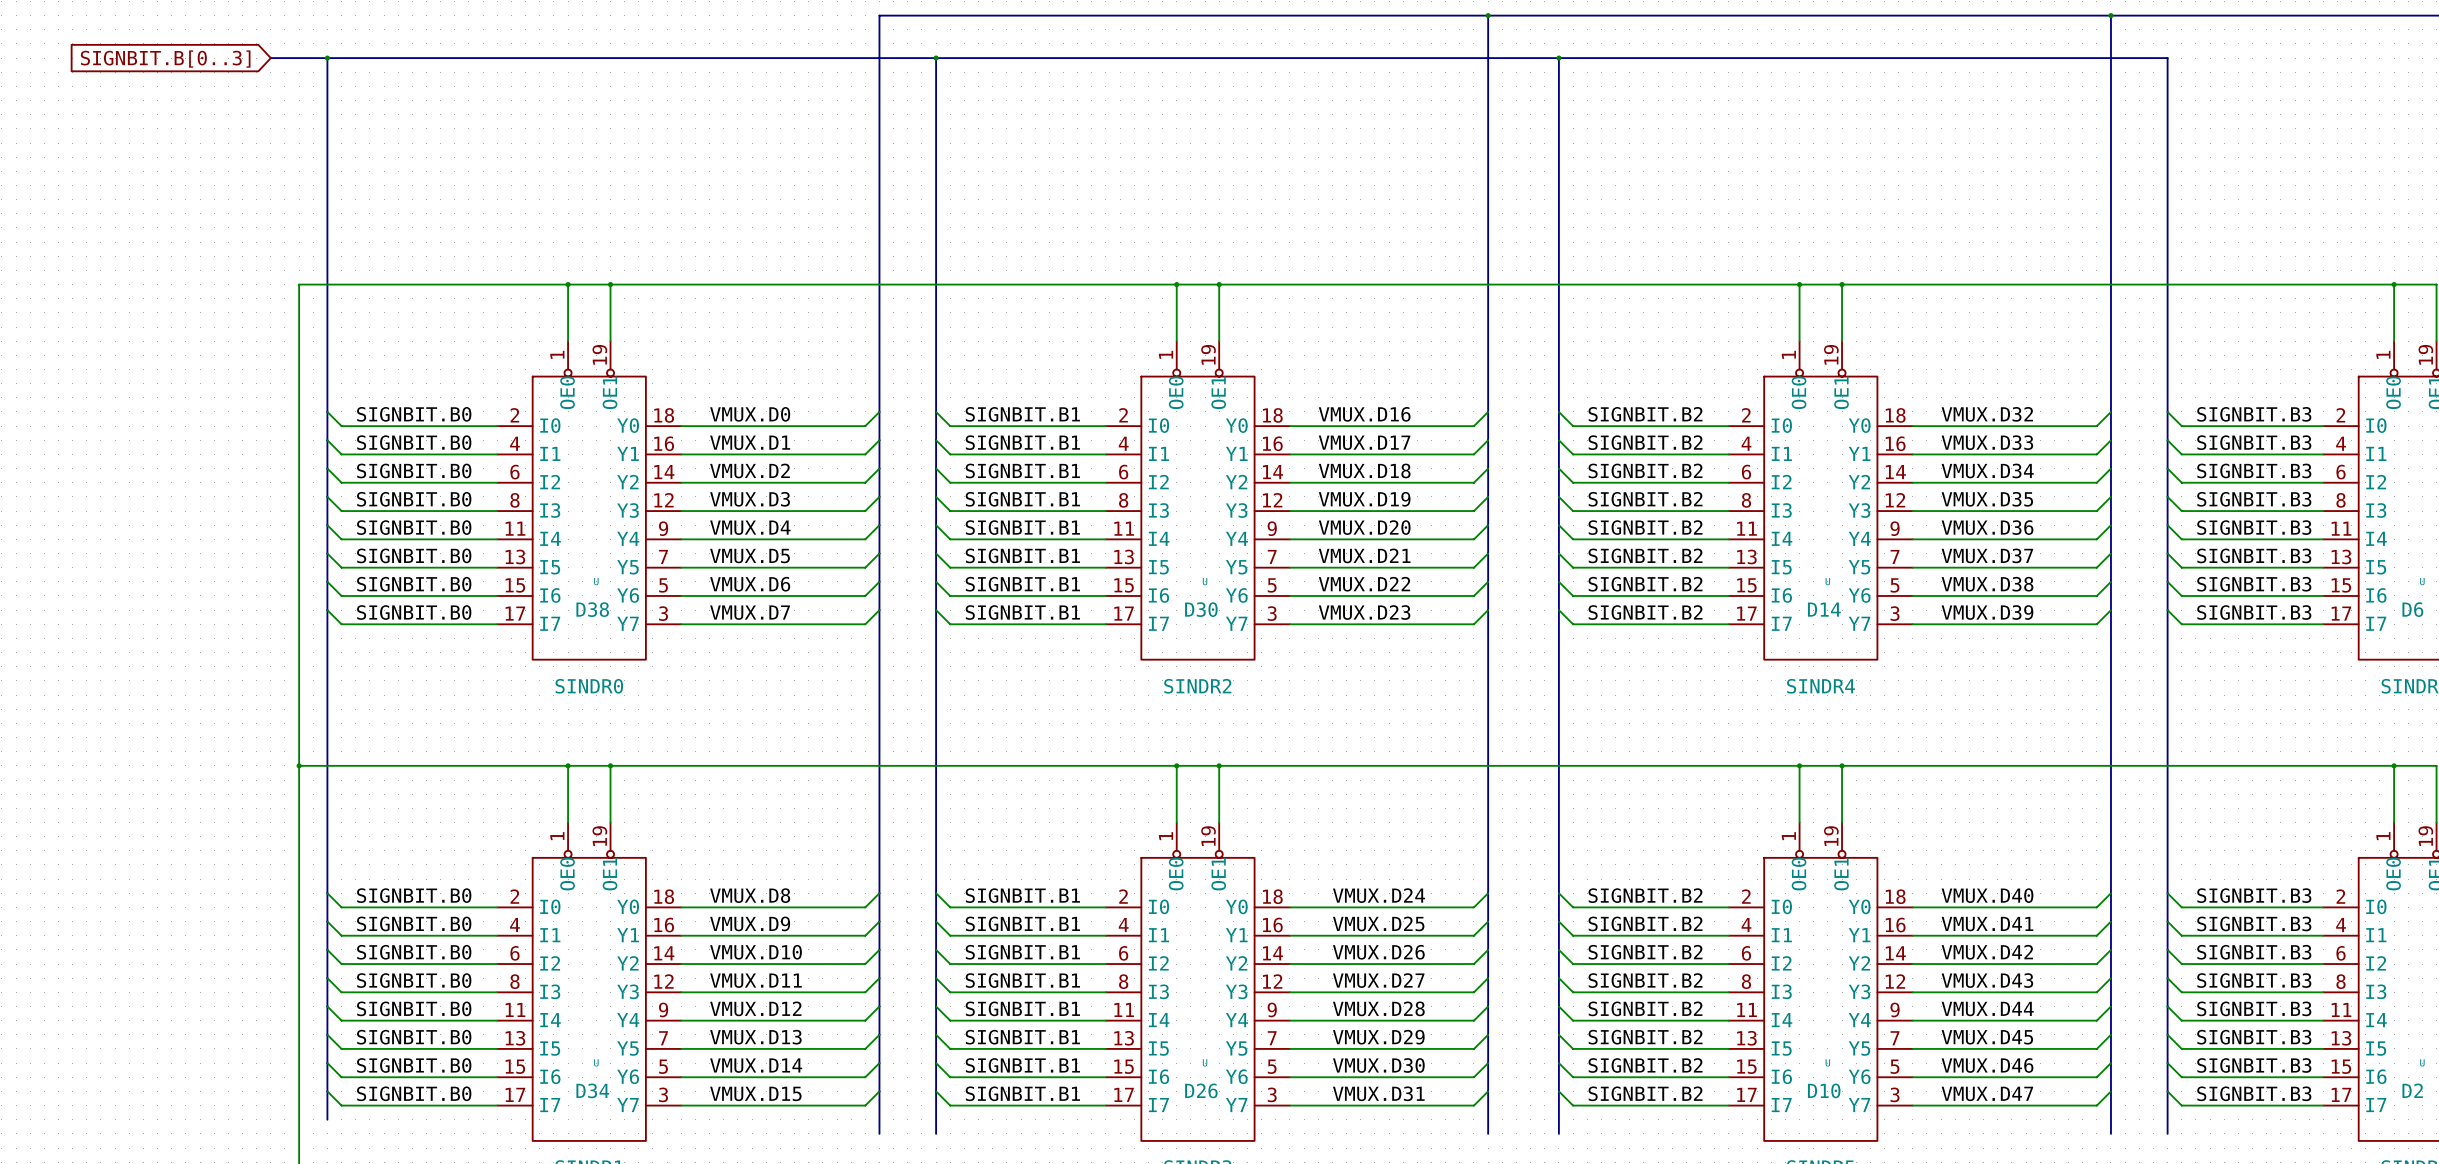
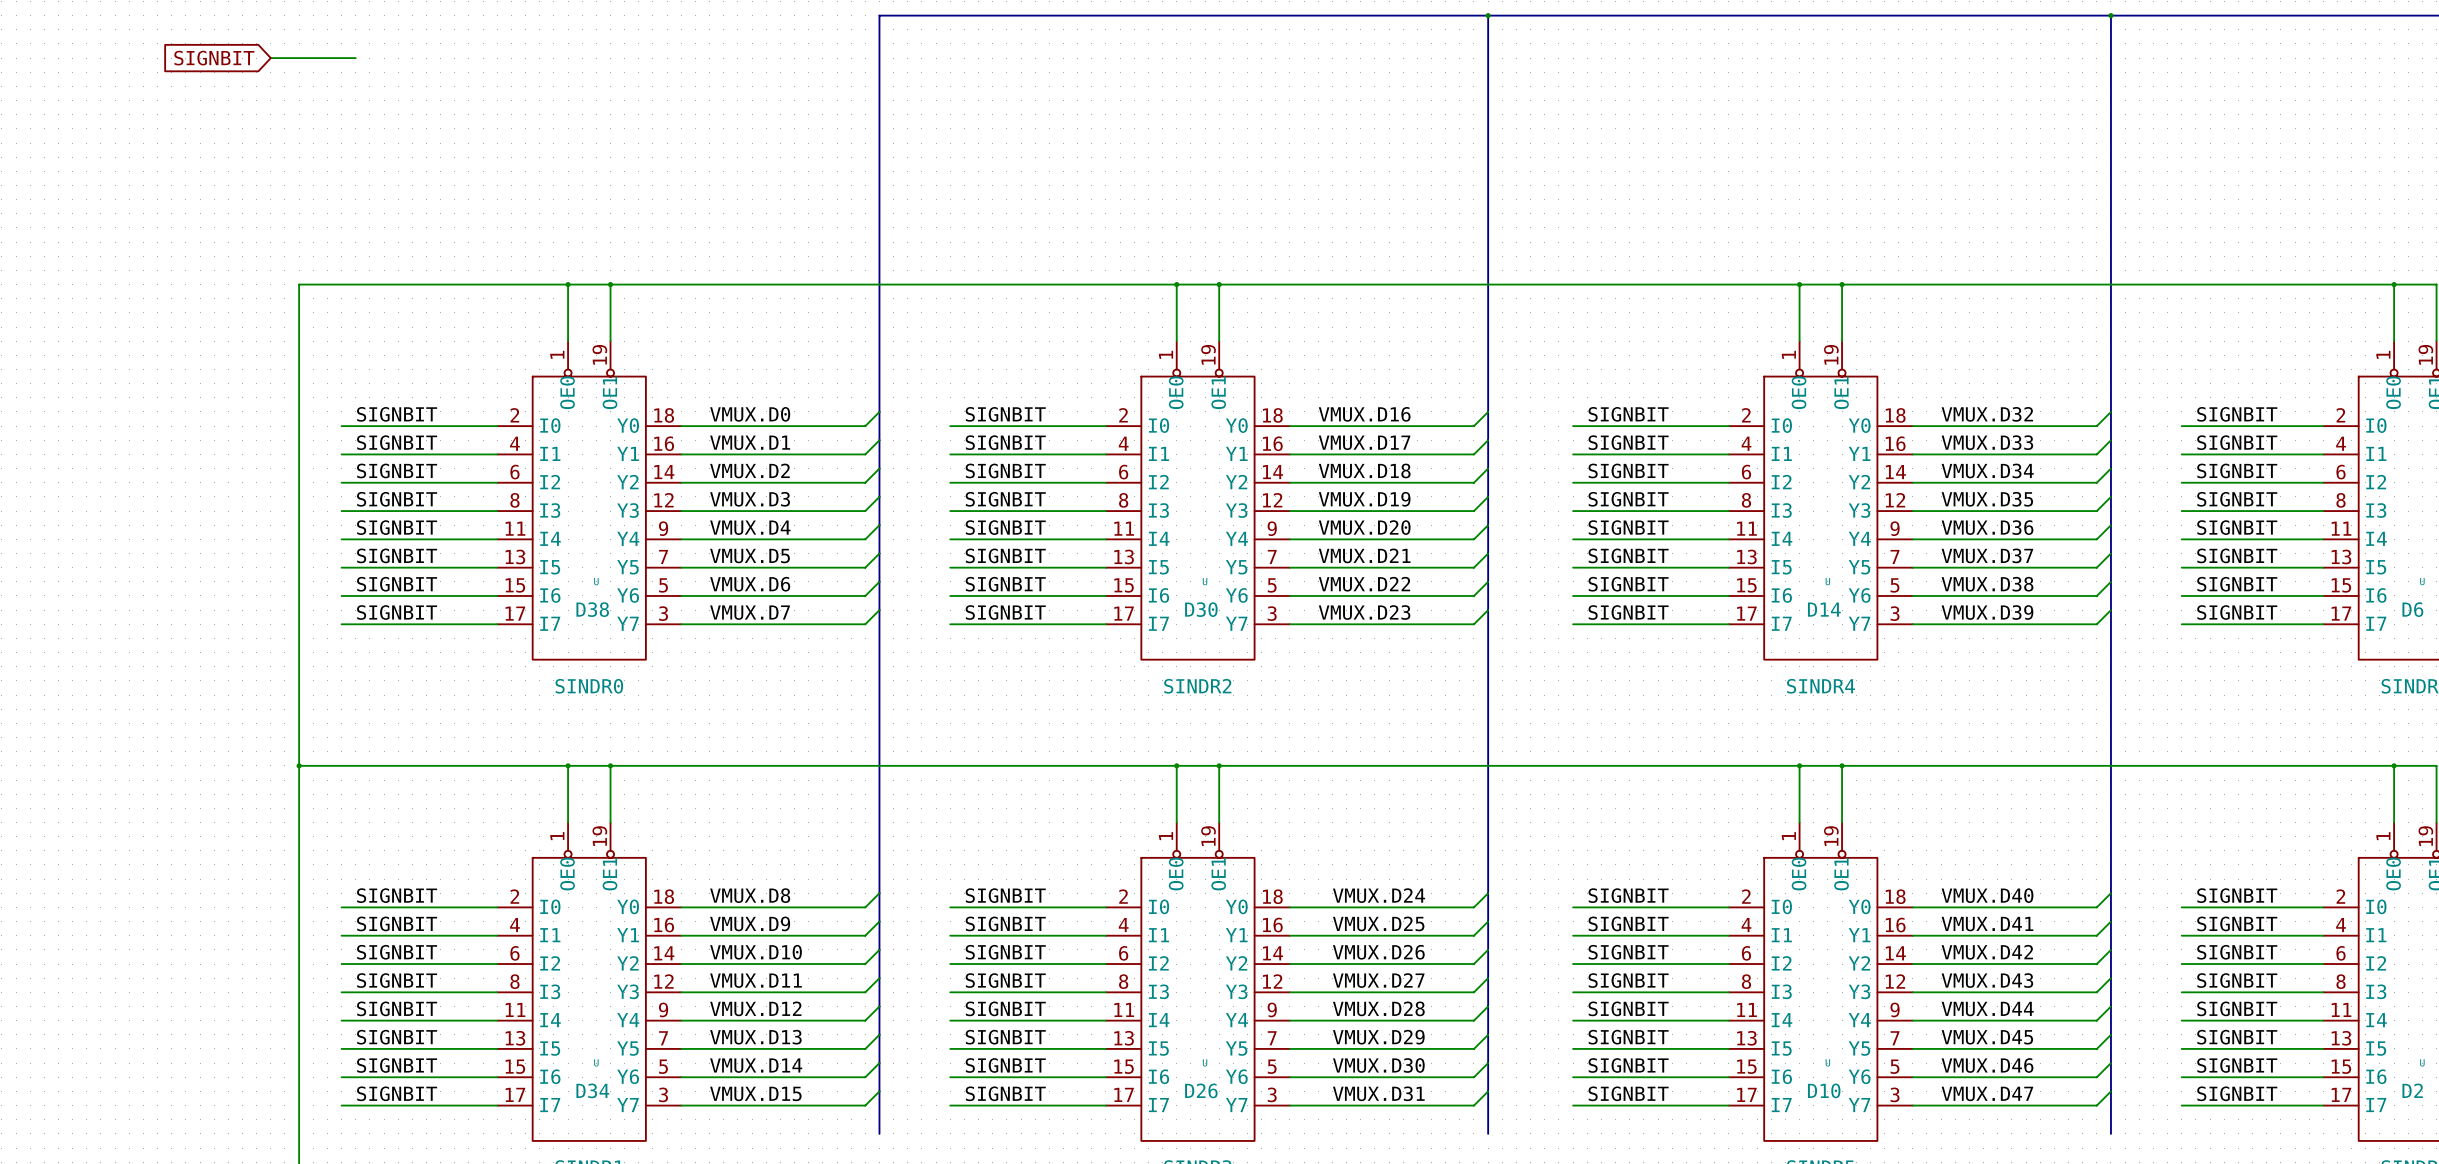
bus: (270, 58) (2167, 58) (2167, 1133) -> none
bus: (327, 58) (327, 1119) -> none
junction: (327, 58) -> none
bus: (936, 58) (936, 1133) -> none
junction: (936, 58) -> none
bus: (1558, 58) (1558, 1133) -> none
junction: (1558, 58) -> none
global label: SIGNBIT.B[0..3] (165, 59) -> SIGNBIT (214, 58)
wire: (327, 411) (341, 426) -> none
wire: (936, 411) (950, 426) -> none
wire: (1558, 411) (1573, 426) -> none
wire: (2167, 411) (2181, 426) -> none
label: SIGNBIT.B0 (414, 414) -> SIGNBIT (397, 414)
label: SIGNBIT.B1 (1022, 414) -> SIGNBIT (1005, 414)
label: SIGNBIT.B2 (1645, 414) -> SIGNBIT (1628, 414)
label: SIGNBIT.B3 (2254, 414) -> SIGNBIT (2237, 414)
wire: (327, 440) (341, 454) -> none
wire: (936, 440) (950, 454) -> none
wire: (1558, 440) (1573, 454) -> none
wire: (2167, 440) (2181, 454) -> none
label: SIGNBIT.B0 (414, 442) -> SIGNBIT (397, 442)
label: SIGNBIT.B1 (1022, 442) -> SIGNBIT (1005, 442)
label: SIGNBIT.B2 (1645, 442) -> SIGNBIT (1628, 442)
label: SIGNBIT.B3 (2254, 442) -> SIGNBIT (2237, 442)
wire: (327, 468) (341, 482) -> none
wire: (936, 468) (950, 482) -> none
wire: (1558, 468) (1573, 482) -> none
wire: (2167, 468) (2181, 482) -> none
label: SIGNBIT.B0 (414, 470) -> SIGNBIT (397, 470)
label: SIGNBIT.B1 (1022, 470) -> SIGNBIT (1005, 470)
label: SIGNBIT.B2 (1645, 470) -> SIGNBIT (1628, 470)
label: SIGNBIT.B3 (2254, 470) -> SIGNBIT (2237, 470)
wire: (327, 496) (341, 511) -> none
wire: (936, 496) (950, 511) -> none
wire: (1558, 496) (1573, 511) -> none
wire: (2167, 496) (2181, 511) -> none
label: SIGNBIT.B0 (414, 499) -> SIGNBIT (397, 499)
label: SIGNBIT.B1 (1022, 499) -> SIGNBIT (1005, 499)
label: SIGNBIT.B2 (1645, 499) -> SIGNBIT (1628, 499)
label: SIGNBIT.B3 (2254, 499) -> SIGNBIT (2237, 499)
wire: (327, 525) (341, 539) -> none
wire: (936, 525) (950, 539) -> none
wire: (1558, 525) (1573, 539) -> none
wire: (2167, 525) (2181, 539) -> none
label: SIGNBIT.B0 (414, 527) -> SIGNBIT (397, 527)
label: SIGNBIT.B1 (1022, 527) -> SIGNBIT (1005, 527)
label: SIGNBIT.B2 (1645, 527) -> SIGNBIT (1628, 527)
label: SIGNBIT.B3 (2254, 527) -> SIGNBIT (2237, 527)
wire: (327, 553) (341, 567) -> none
wire: (936, 553) (950, 567) -> none
wire: (1558, 553) (1573, 567) -> none
wire: (2167, 553) (2181, 567) -> none
label: SIGNBIT.B0 (414, 555) -> SIGNBIT (397, 555)
label: SIGNBIT.B1 (1022, 555) -> SIGNBIT (1005, 555)
label: SIGNBIT.B2 (1645, 555) -> SIGNBIT (1628, 555)
label: SIGNBIT.B3 (2254, 555) -> SIGNBIT (2237, 555)
wire: (327, 581) (341, 595) -> none
wire: (936, 581) (950, 595) -> none
wire: (1558, 581) (1573, 595) -> none
wire: (2167, 581) (2181, 595) -> none
label: SIGNBIT.B0 (414, 584) -> SIGNBIT (397, 584)
label: SIGNBIT.B1 (1022, 584) -> SIGNBIT (1005, 584)
label: SIGNBIT.B2 (1645, 584) -> SIGNBIT (1628, 584)
label: SIGNBIT.B3 (2254, 584) -> SIGNBIT (2237, 584)
wire: (327, 610) (341, 624) -> none
wire: (936, 610) (950, 624) -> none
wire: (1558, 610) (1573, 624) -> none
wire: (2167, 610) (2181, 624) -> none
label: SIGNBIT.B0 (414, 612) -> SIGNBIT (397, 612)
label: SIGNBIT.B1 (1022, 612) -> SIGNBIT (1005, 612)
label: SIGNBIT.B2 (1645, 612) -> SIGNBIT (1628, 612)
label: SIGNBIT.B3 (2254, 612) -> SIGNBIT (2237, 612)
wire: (327, 893) (341, 907) -> none
wire: (936, 893) (950, 907) -> none
wire: (1558, 893) (1573, 907) -> none
wire: (2167, 893) (2181, 907) -> none
label: SIGNBIT.B0 (414, 895) -> SIGNBIT (397, 895)
label: SIGNBIT.B1 (1022, 895) -> SIGNBIT (1005, 895)
label: SIGNBIT.B2 (1645, 895) -> SIGNBIT (1628, 895)
label: SIGNBIT.B3 (2254, 895) -> SIGNBIT (2237, 895)
wire: (327, 921) (341, 935) -> none
wire: (936, 921) (950, 935) -> none
wire: (1558, 921) (1573, 935) -> none
wire: (2167, 921) (2181, 935) -> none
label: SIGNBIT.B0 (414, 923) -> SIGNBIT (397, 923)
label: SIGNBIT.B1 (1022, 923) -> SIGNBIT (1005, 923)
label: SIGNBIT.B2 (1645, 923) -> SIGNBIT (1628, 923)
label: SIGNBIT.B3 (2254, 923) -> SIGNBIT (2237, 923)
wire: (327, 949) (341, 964) -> none
wire: (936, 949) (950, 964) -> none
wire: (1558, 949) (1573, 964) -> none
wire: (2167, 949) (2181, 964) -> none
label: SIGNBIT.B0 (414, 952) -> SIGNBIT (397, 952)
label: SIGNBIT.B1 (1022, 952) -> SIGNBIT (1005, 952)
label: SIGNBIT.B2 (1645, 952) -> SIGNBIT (1628, 952)
label: SIGNBIT.B3 (2254, 952) -> SIGNBIT (2237, 952)
wire: (327, 978) (341, 992) -> none
wire: (936, 978) (950, 992) -> none
wire: (1558, 978) (1573, 992) -> none
wire: (2167, 978) (2181, 992) -> none
label: SIGNBIT.B0 (414, 980) -> SIGNBIT (397, 980)
label: SIGNBIT.B1 (1022, 980) -> SIGNBIT (1005, 980)
label: SIGNBIT.B2 (1645, 980) -> SIGNBIT (1628, 980)
label: SIGNBIT.B3 (2254, 980) -> SIGNBIT (2237, 980)
wire: (327, 1006) (341, 1020) -> none
wire: (936, 1006) (950, 1020) -> none
wire: (1558, 1006) (1573, 1020) -> none
wire: (2167, 1006) (2181, 1020) -> none
label: SIGNBIT.B0 (414, 1008) -> SIGNBIT (397, 1008)
label: SIGNBIT.B1 (1022, 1008) -> SIGNBIT (1005, 1008)
label: SIGNBIT.B2 (1645, 1008) -> SIGNBIT (1628, 1008)
label: SIGNBIT.B3 (2254, 1008) -> SIGNBIT (2237, 1008)
wire: (327, 1034) (341, 1048) -> none
wire: (936, 1034) (950, 1048) -> none
wire: (1558, 1034) (1573, 1048) -> none
wire: (2167, 1034) (2181, 1048) -> none
label: SIGNBIT.B0 (414, 1037) -> SIGNBIT (397, 1037)
label: SIGNBIT.B1 (1022, 1037) -> SIGNBIT (1005, 1037)
label: SIGNBIT.B2 (1645, 1037) -> SIGNBIT (1628, 1037)
label: SIGNBIT.B3 (2254, 1037) -> SIGNBIT (2237, 1037)
wire: (327, 1063) (341, 1077) -> none
wire: (936, 1063) (950, 1077) -> none
wire: (1558, 1063) (1573, 1077) -> none
wire: (2167, 1063) (2181, 1077) -> none
label: SIGNBIT.B0 (414, 1065) -> SIGNBIT (397, 1065)
label: SIGNBIT.B1 (1022, 1065) -> SIGNBIT (1005, 1065)
label: SIGNBIT.B2 (1645, 1065) -> SIGNBIT (1628, 1065)
label: SIGNBIT.B3 (2254, 1065) -> SIGNBIT (2237, 1065)
wire: (327, 1091) (341, 1105) -> none
wire: (936, 1091) (950, 1105) -> none
wire: (1558, 1091) (1573, 1105) -> none
wire: (2167, 1091) (2181, 1105) -> none
label: SIGNBIT.B0 (414, 1093) -> SIGNBIT (397, 1093)
label: SIGNBIT.B1 (1022, 1093) -> SIGNBIT (1005, 1093)
label: SIGNBIT.B2 (1645, 1093) -> SIGNBIT (1628, 1093)
label: SIGNBIT.B3 (2254, 1093) -> SIGNBIT (2237, 1093)

